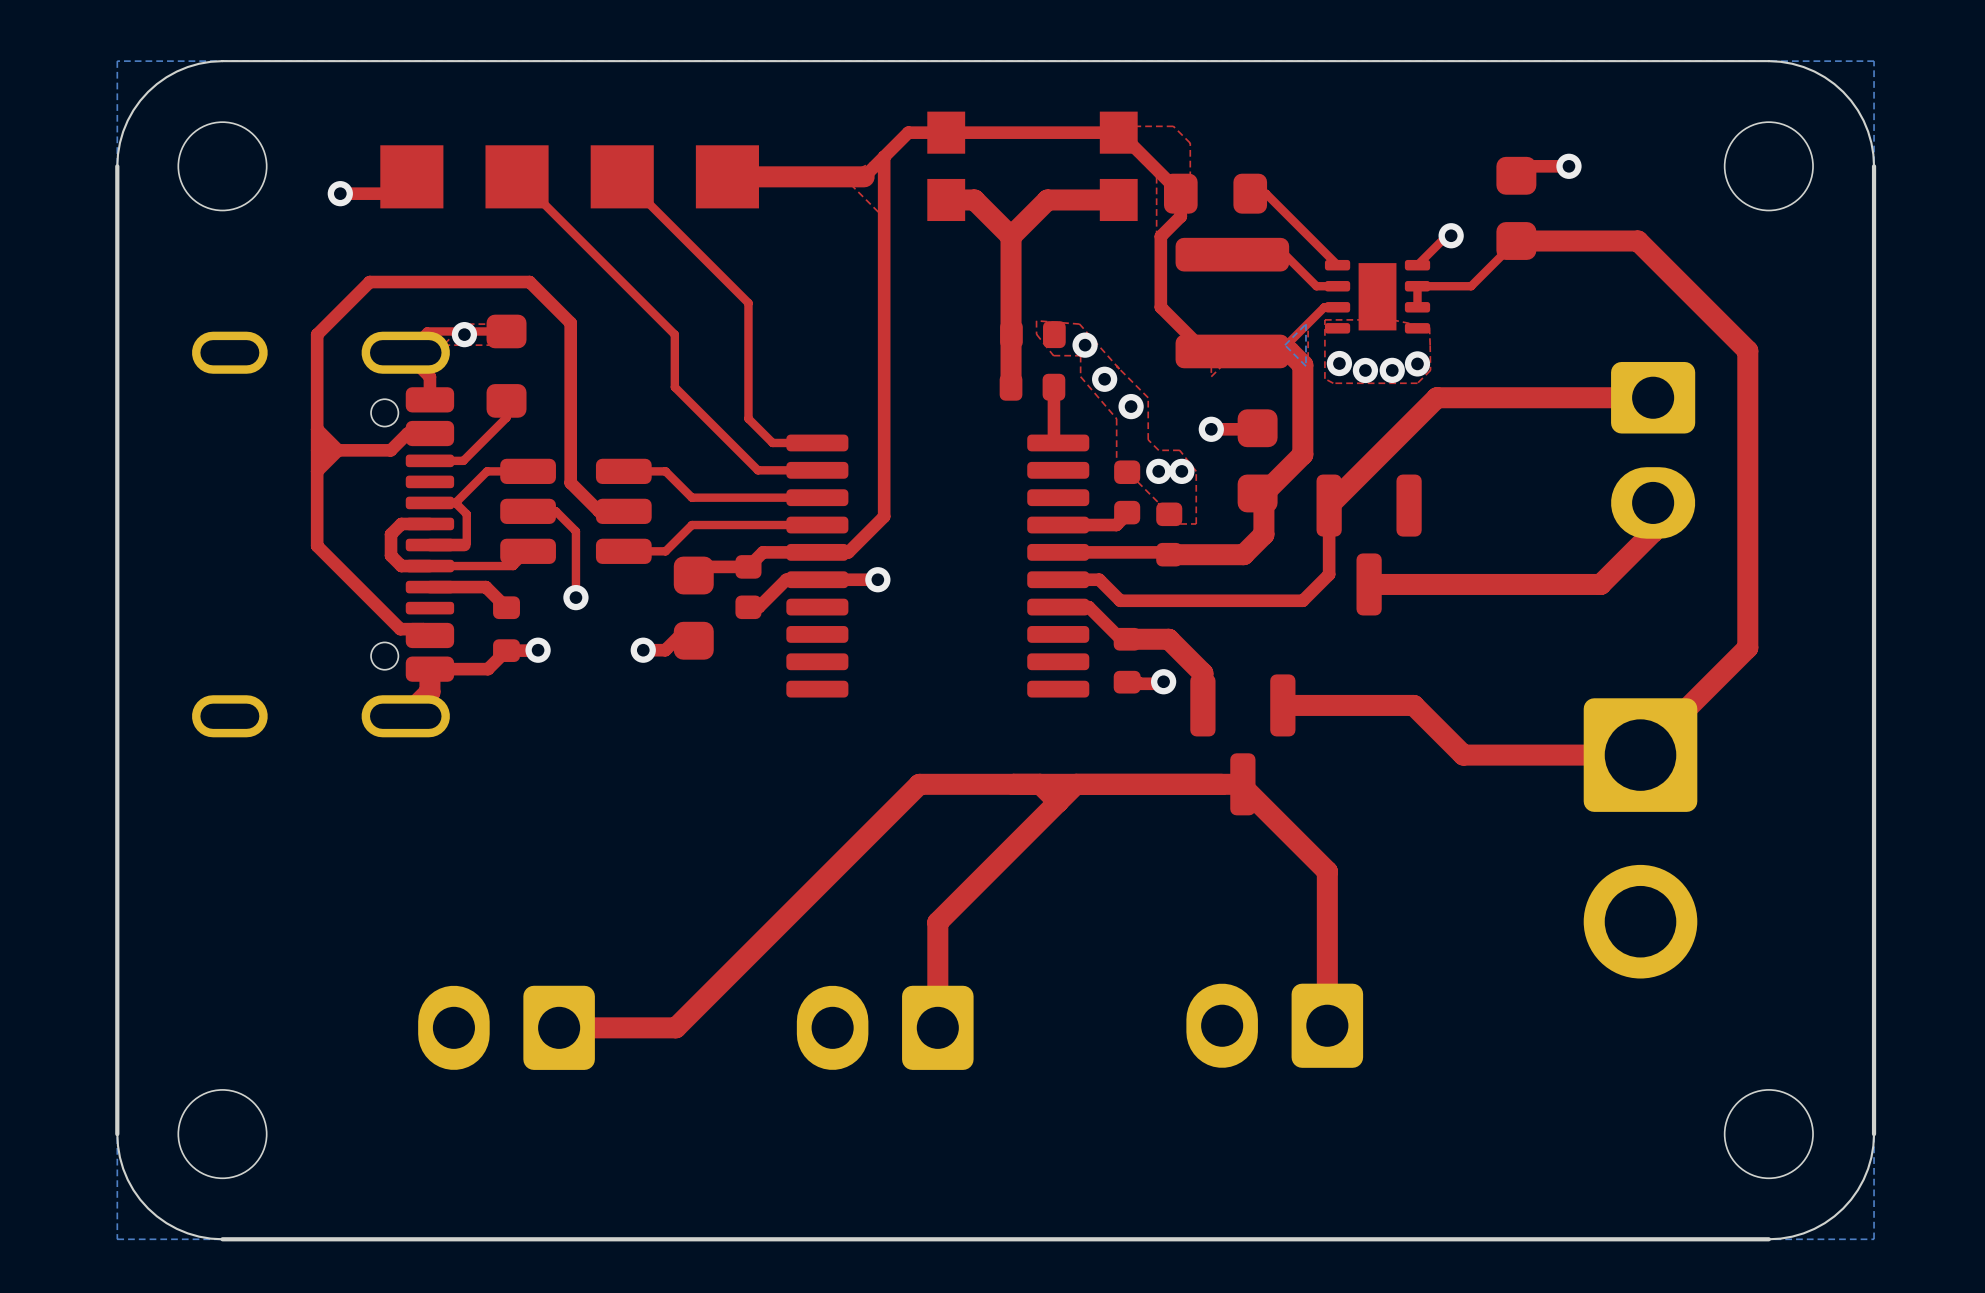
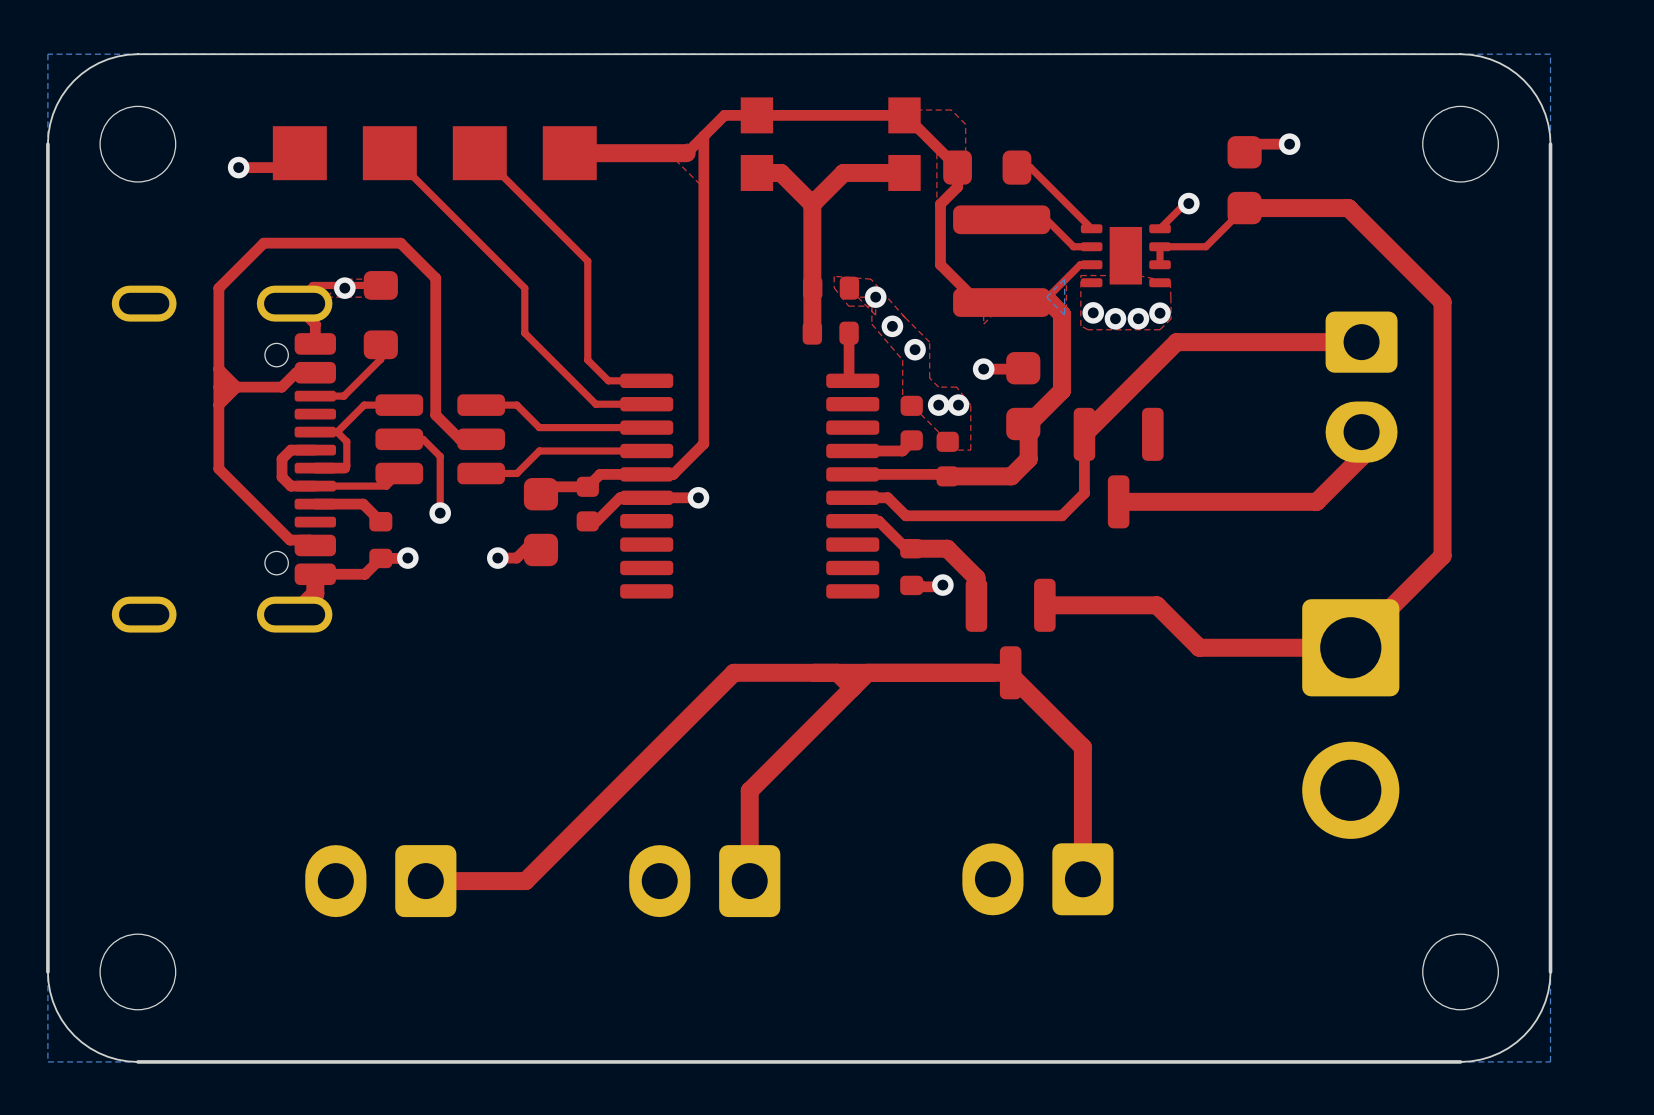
top zone outline: none -> (875, 297) (875, 315) (857, 297) (875, 297)

